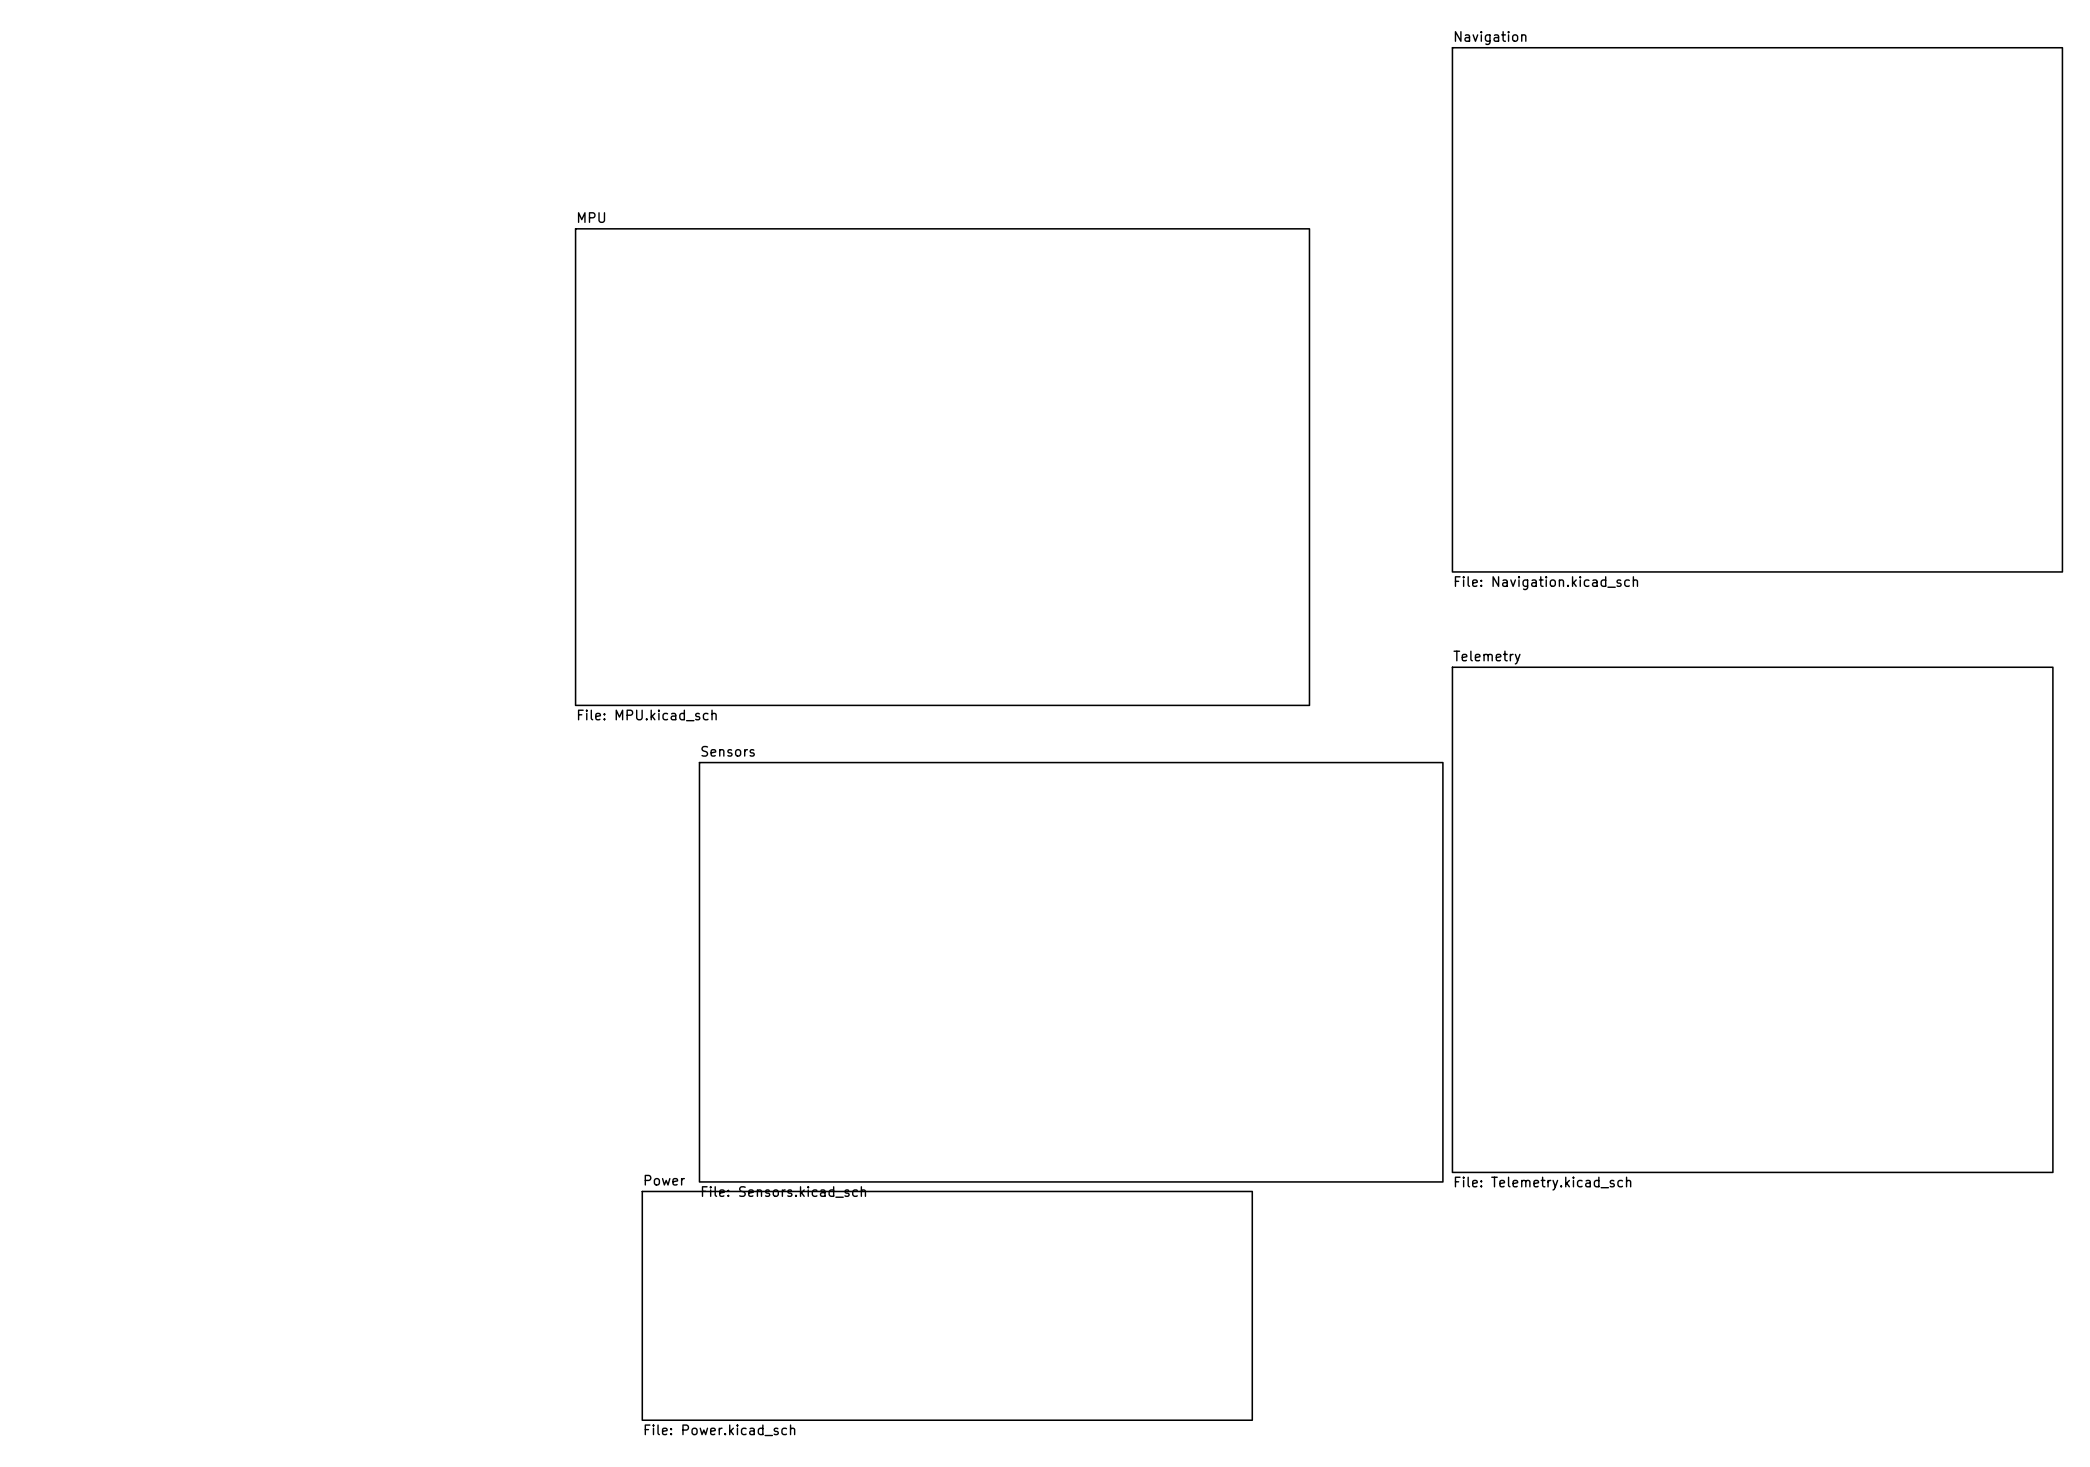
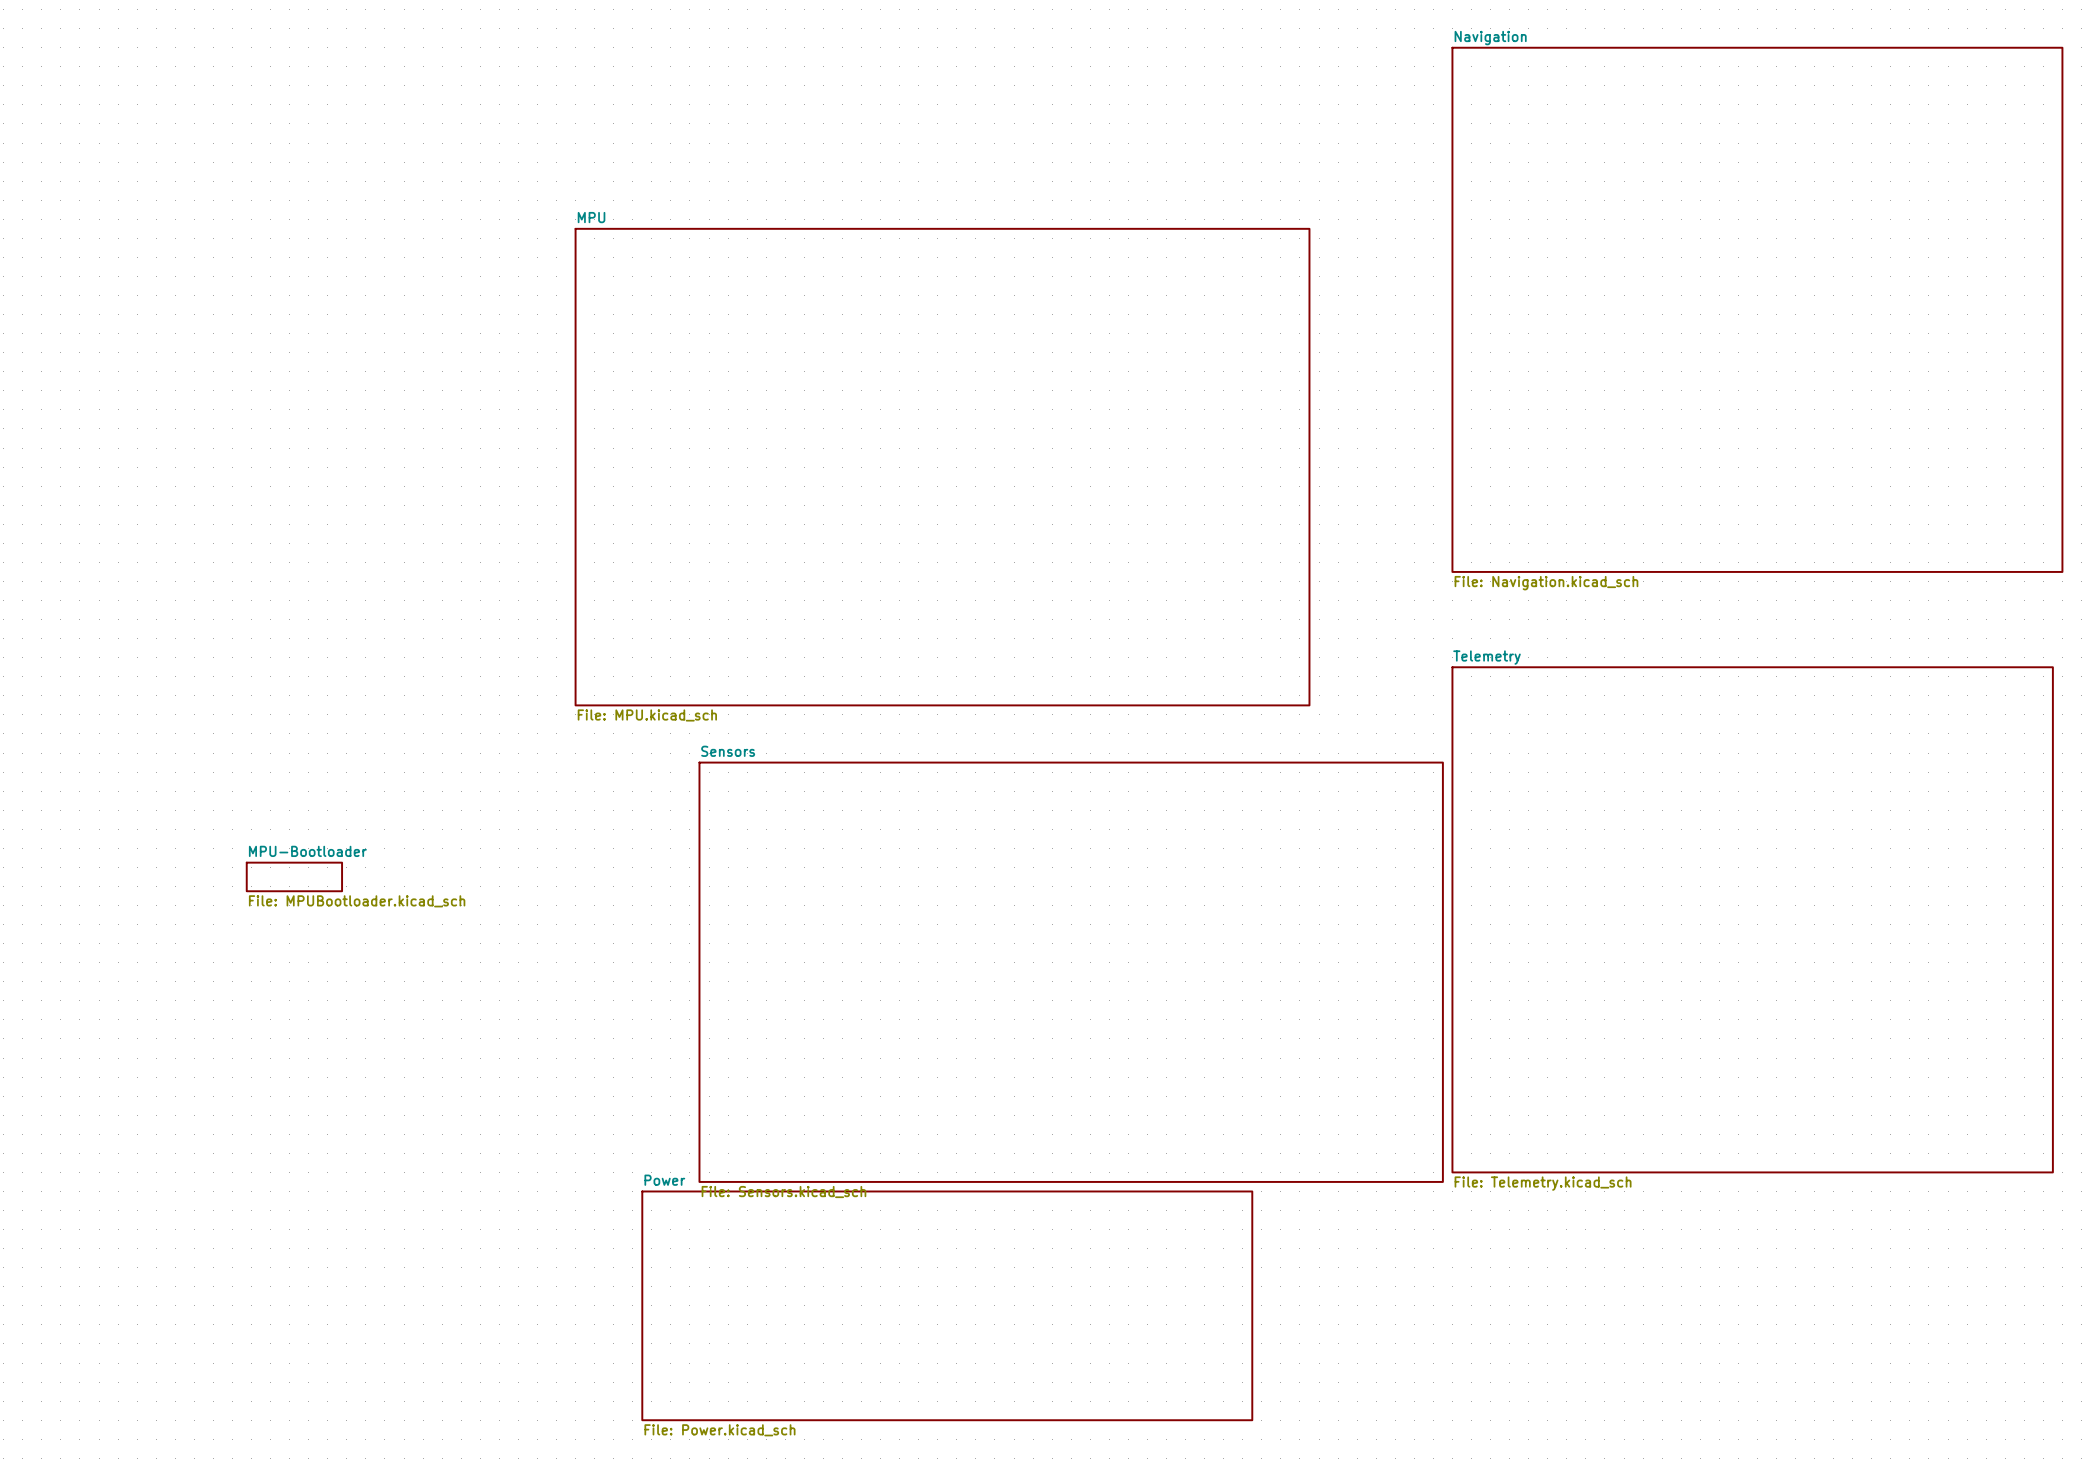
sheet MPU-Bootloader: none -> File: MPUBootloader.kicad_sch (294, 876)

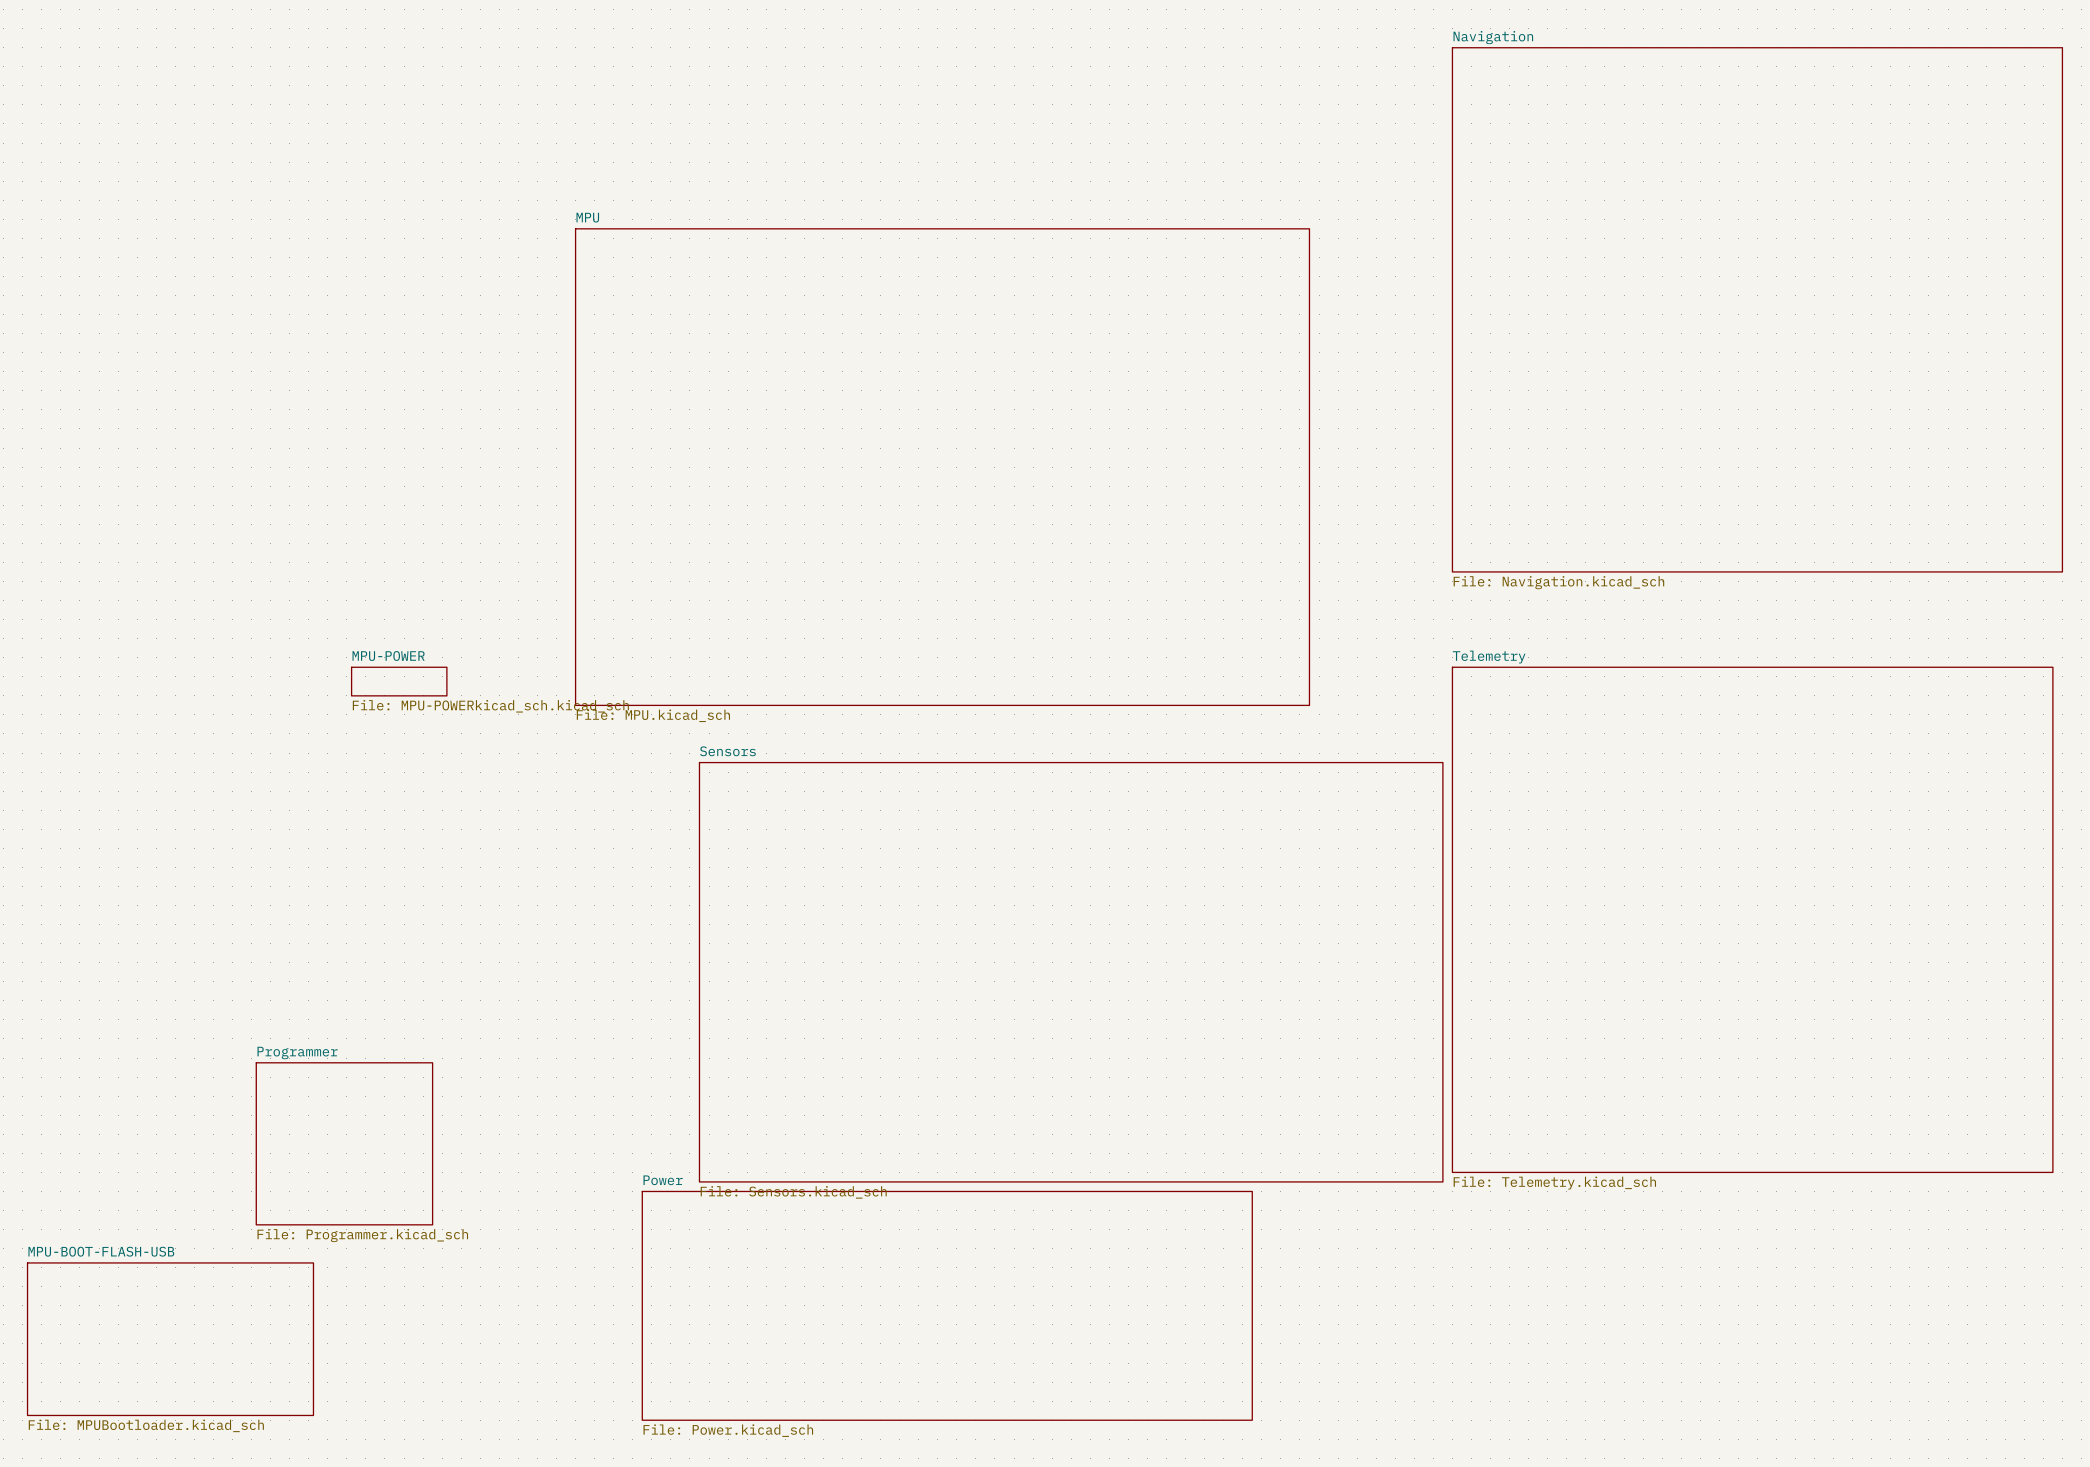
sheet MPU-POWER: none -> File: MPU-POWERkicad_sch.kicad_sch (399, 681)
sheet MPU-Bootloader: File: MPUBootloader.kicad_sch (294, 876) -> none
sheet Programmer: none -> File: Programmer.kicad_sch (344, 1143)
sheet MPU-BOOT-FLASH-USB: none -> File: MPUBootloader.kicad_sch (170, 1339)

